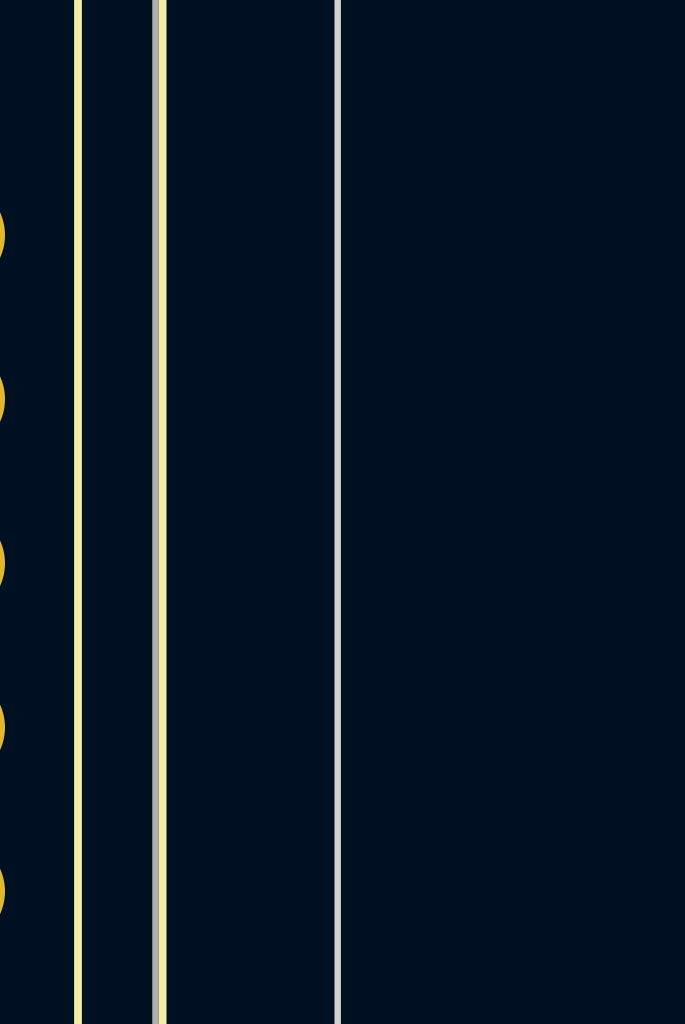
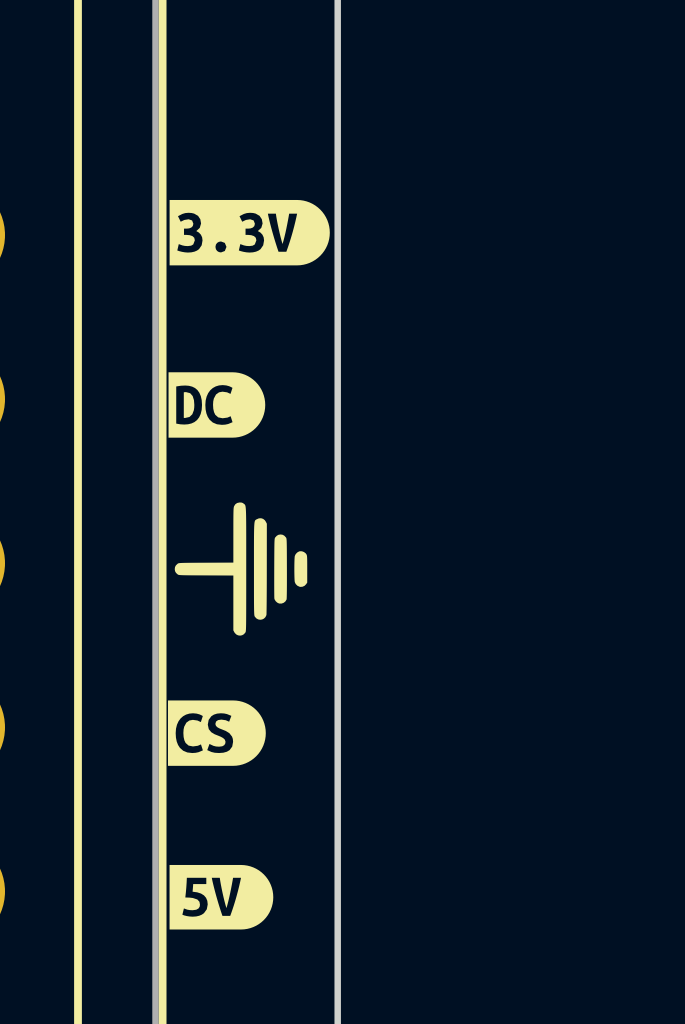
drawing: none -> [169, 199, 330, 266]
drawing: none -> [167, 372, 308, 766]
drawing: none -> [169, 864, 274, 930]

